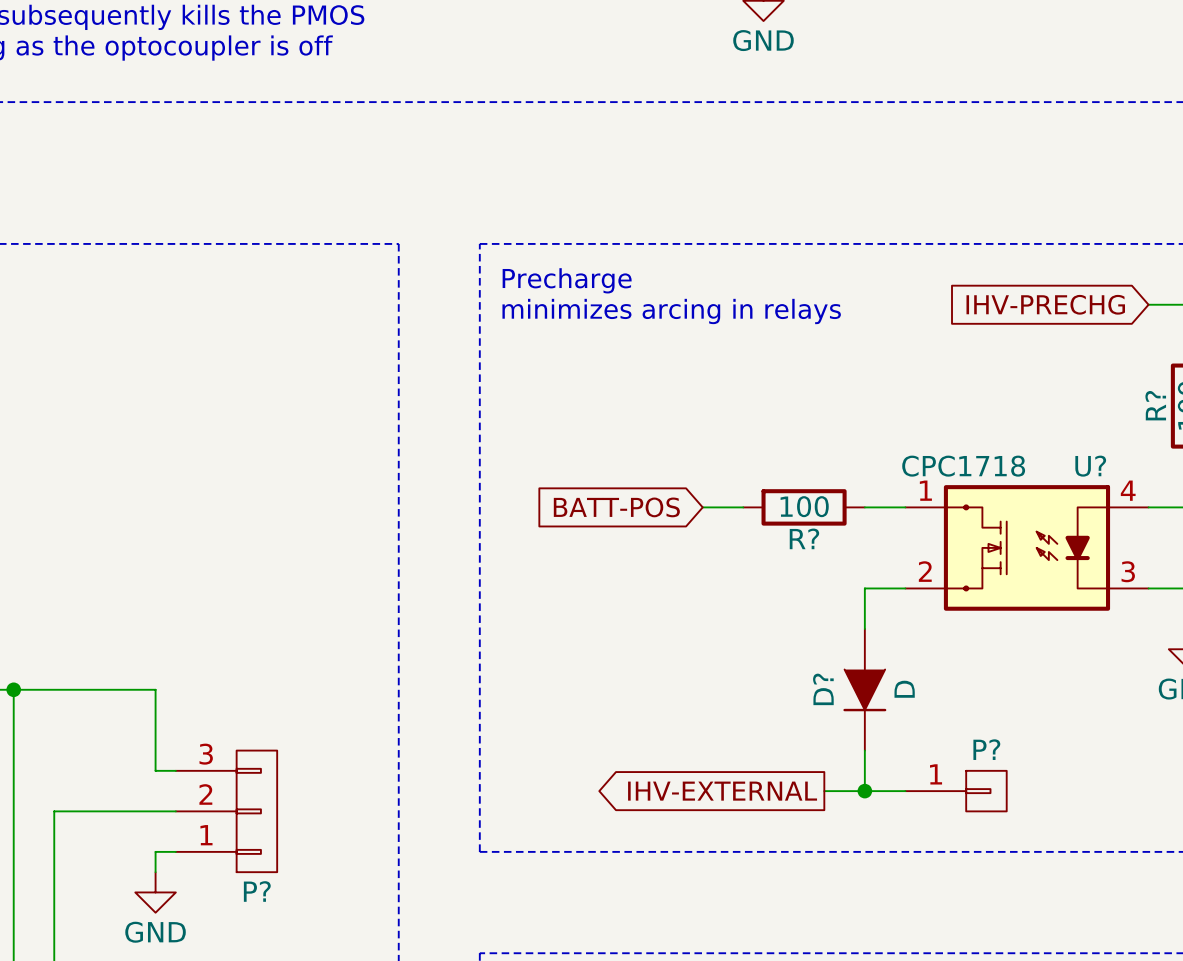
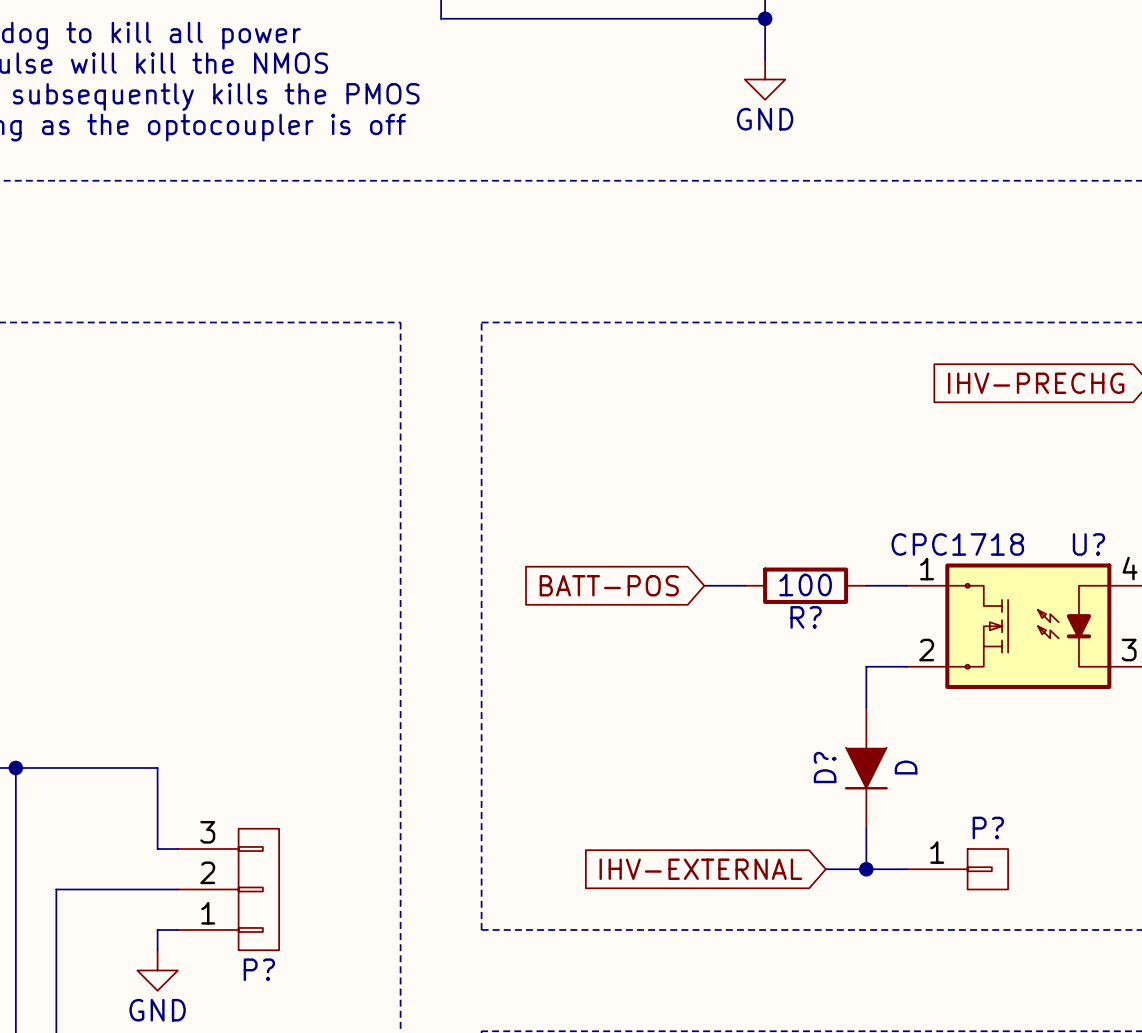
text: Precharge (567, 280) -> none
text: minimizes arcing in relays (671, 311) -> none
global label shape: output (722, 791) -> input (700, 869)

